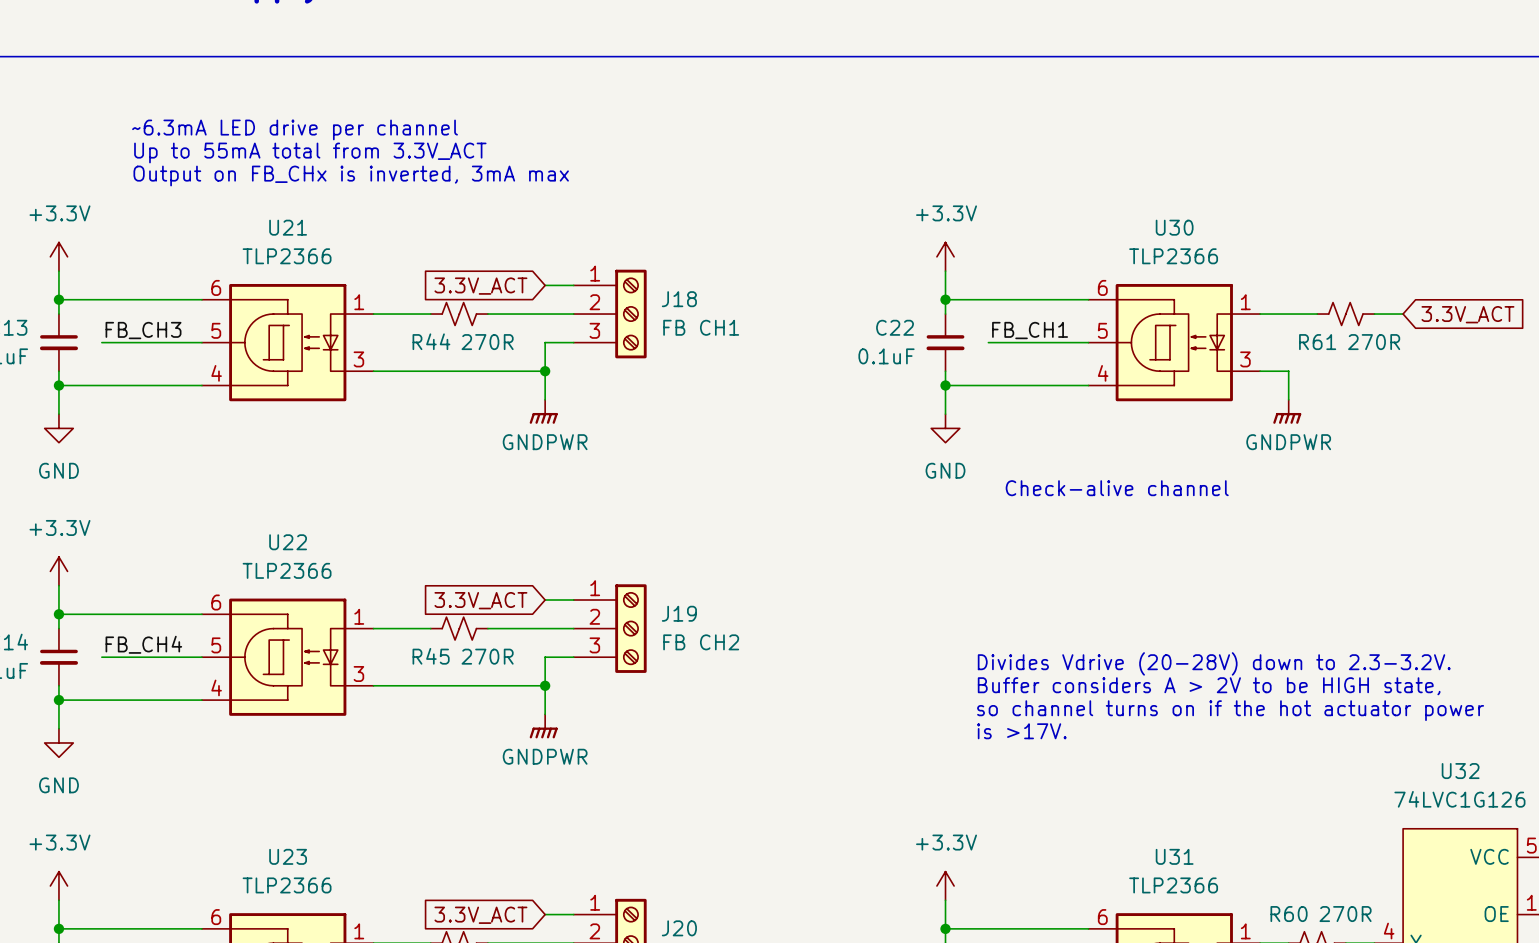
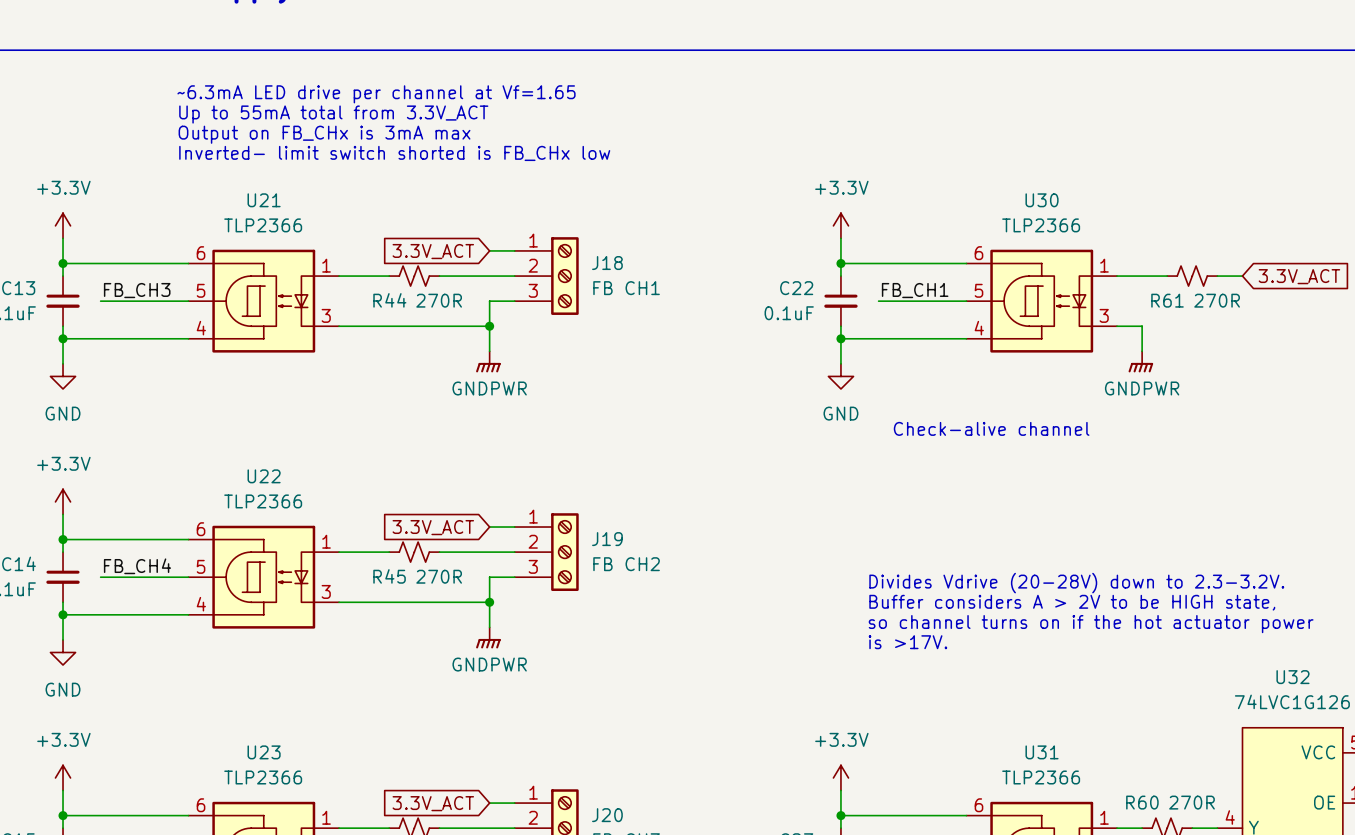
text: ~6.3mA LED drive per channel (295, 129) -> ~6.3mA LED drive per channel at Vf=1.65 (376, 94)
text position: Up to 55mA total from 3.3V_ACT (310, 152) -> Up to 55mA total from 3.3V_ACT (333, 114)
text: none -> Inverted- limit switch shorted is FB_CHx low (394, 153)
text: Output on FB_CHx is inverted, 3mA max (351, 175) -> Output on FB_CHx is 3mA max (324, 134)

